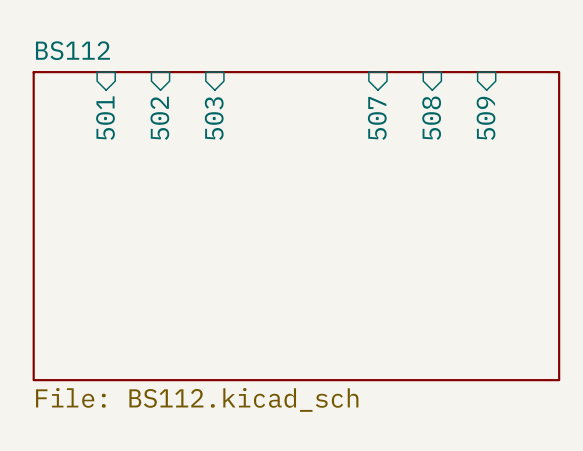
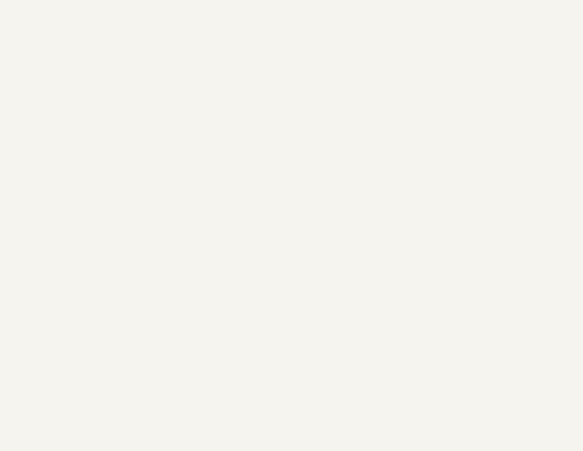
sheet pin: 501 (105, 118) -> none
sheet pin: 502 (159, 118) -> none
sheet pin: 503 (214, 118) -> none
sheet pin: 507 (377, 118) -> none
sheet pin: 508 (431, 118) -> none
sheet pin: 509 (485, 118) -> none
sheet BS112: File: BS112.kicad_sch (296, 226) -> none

